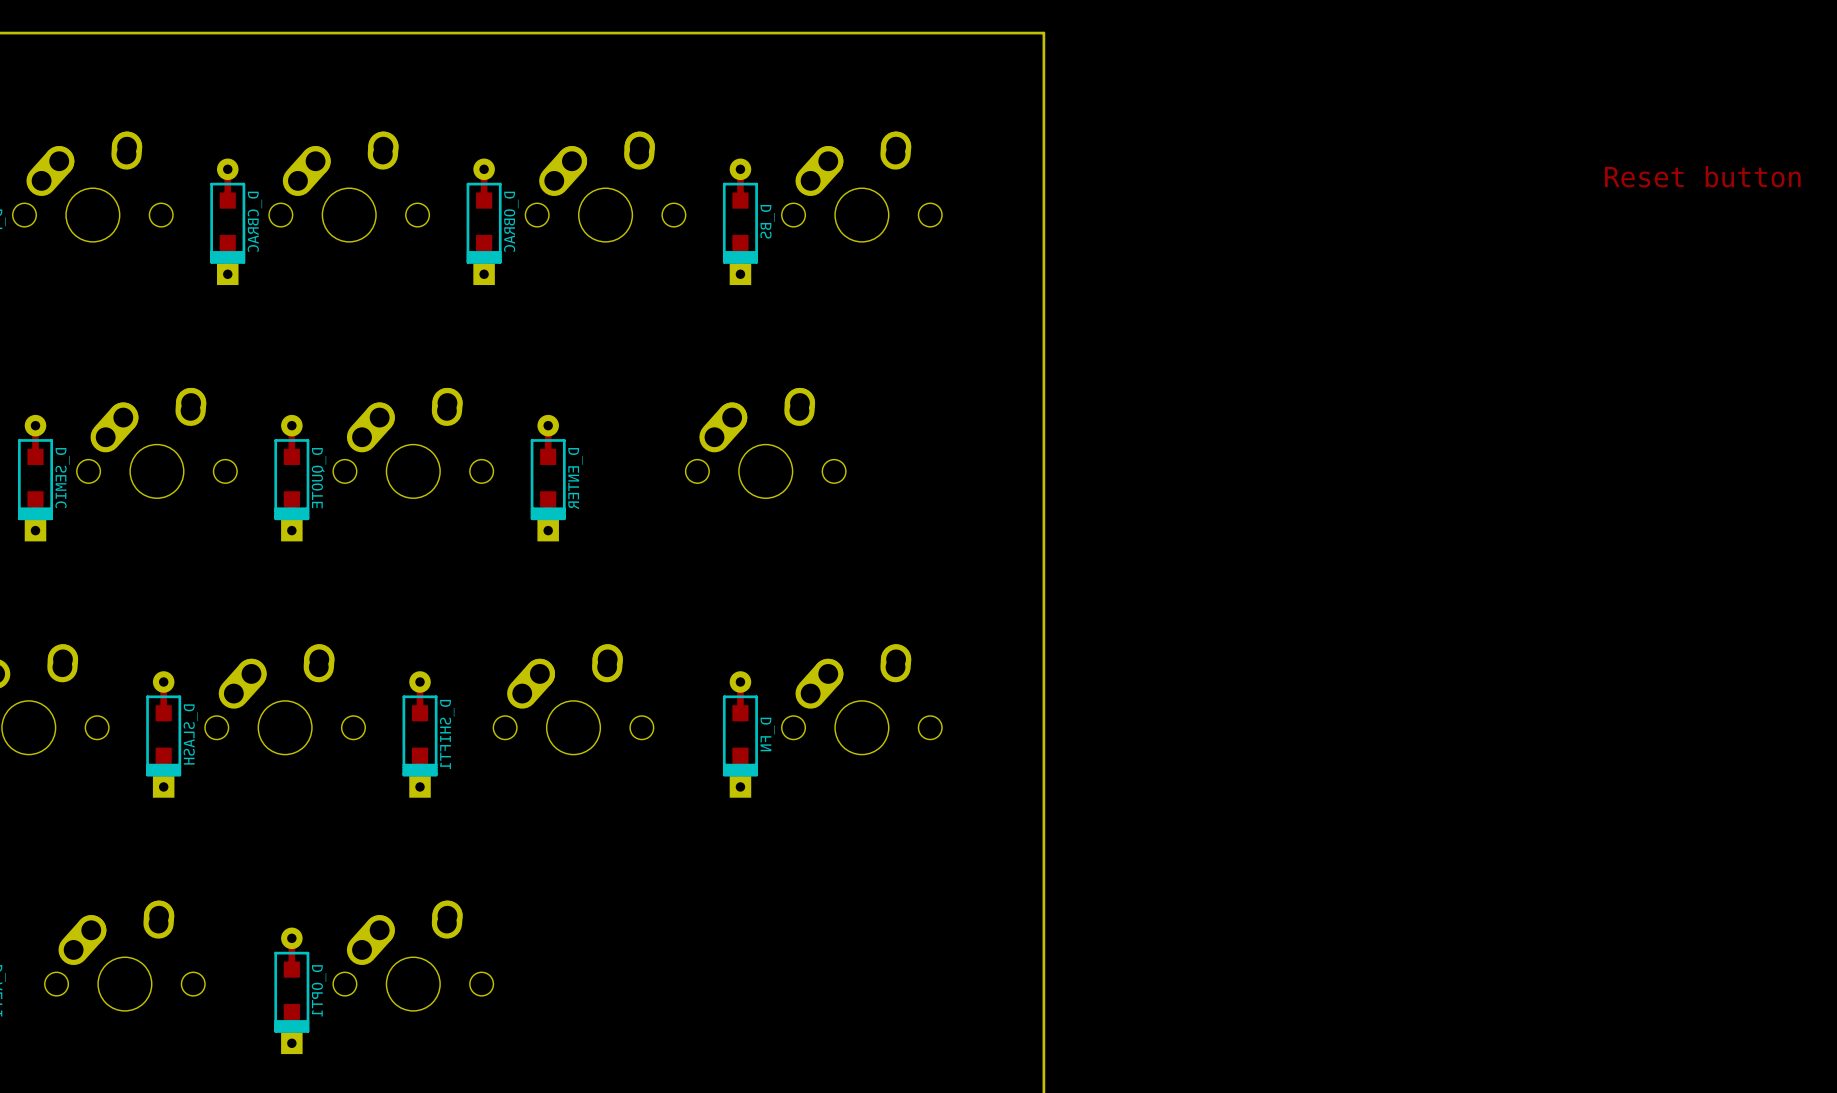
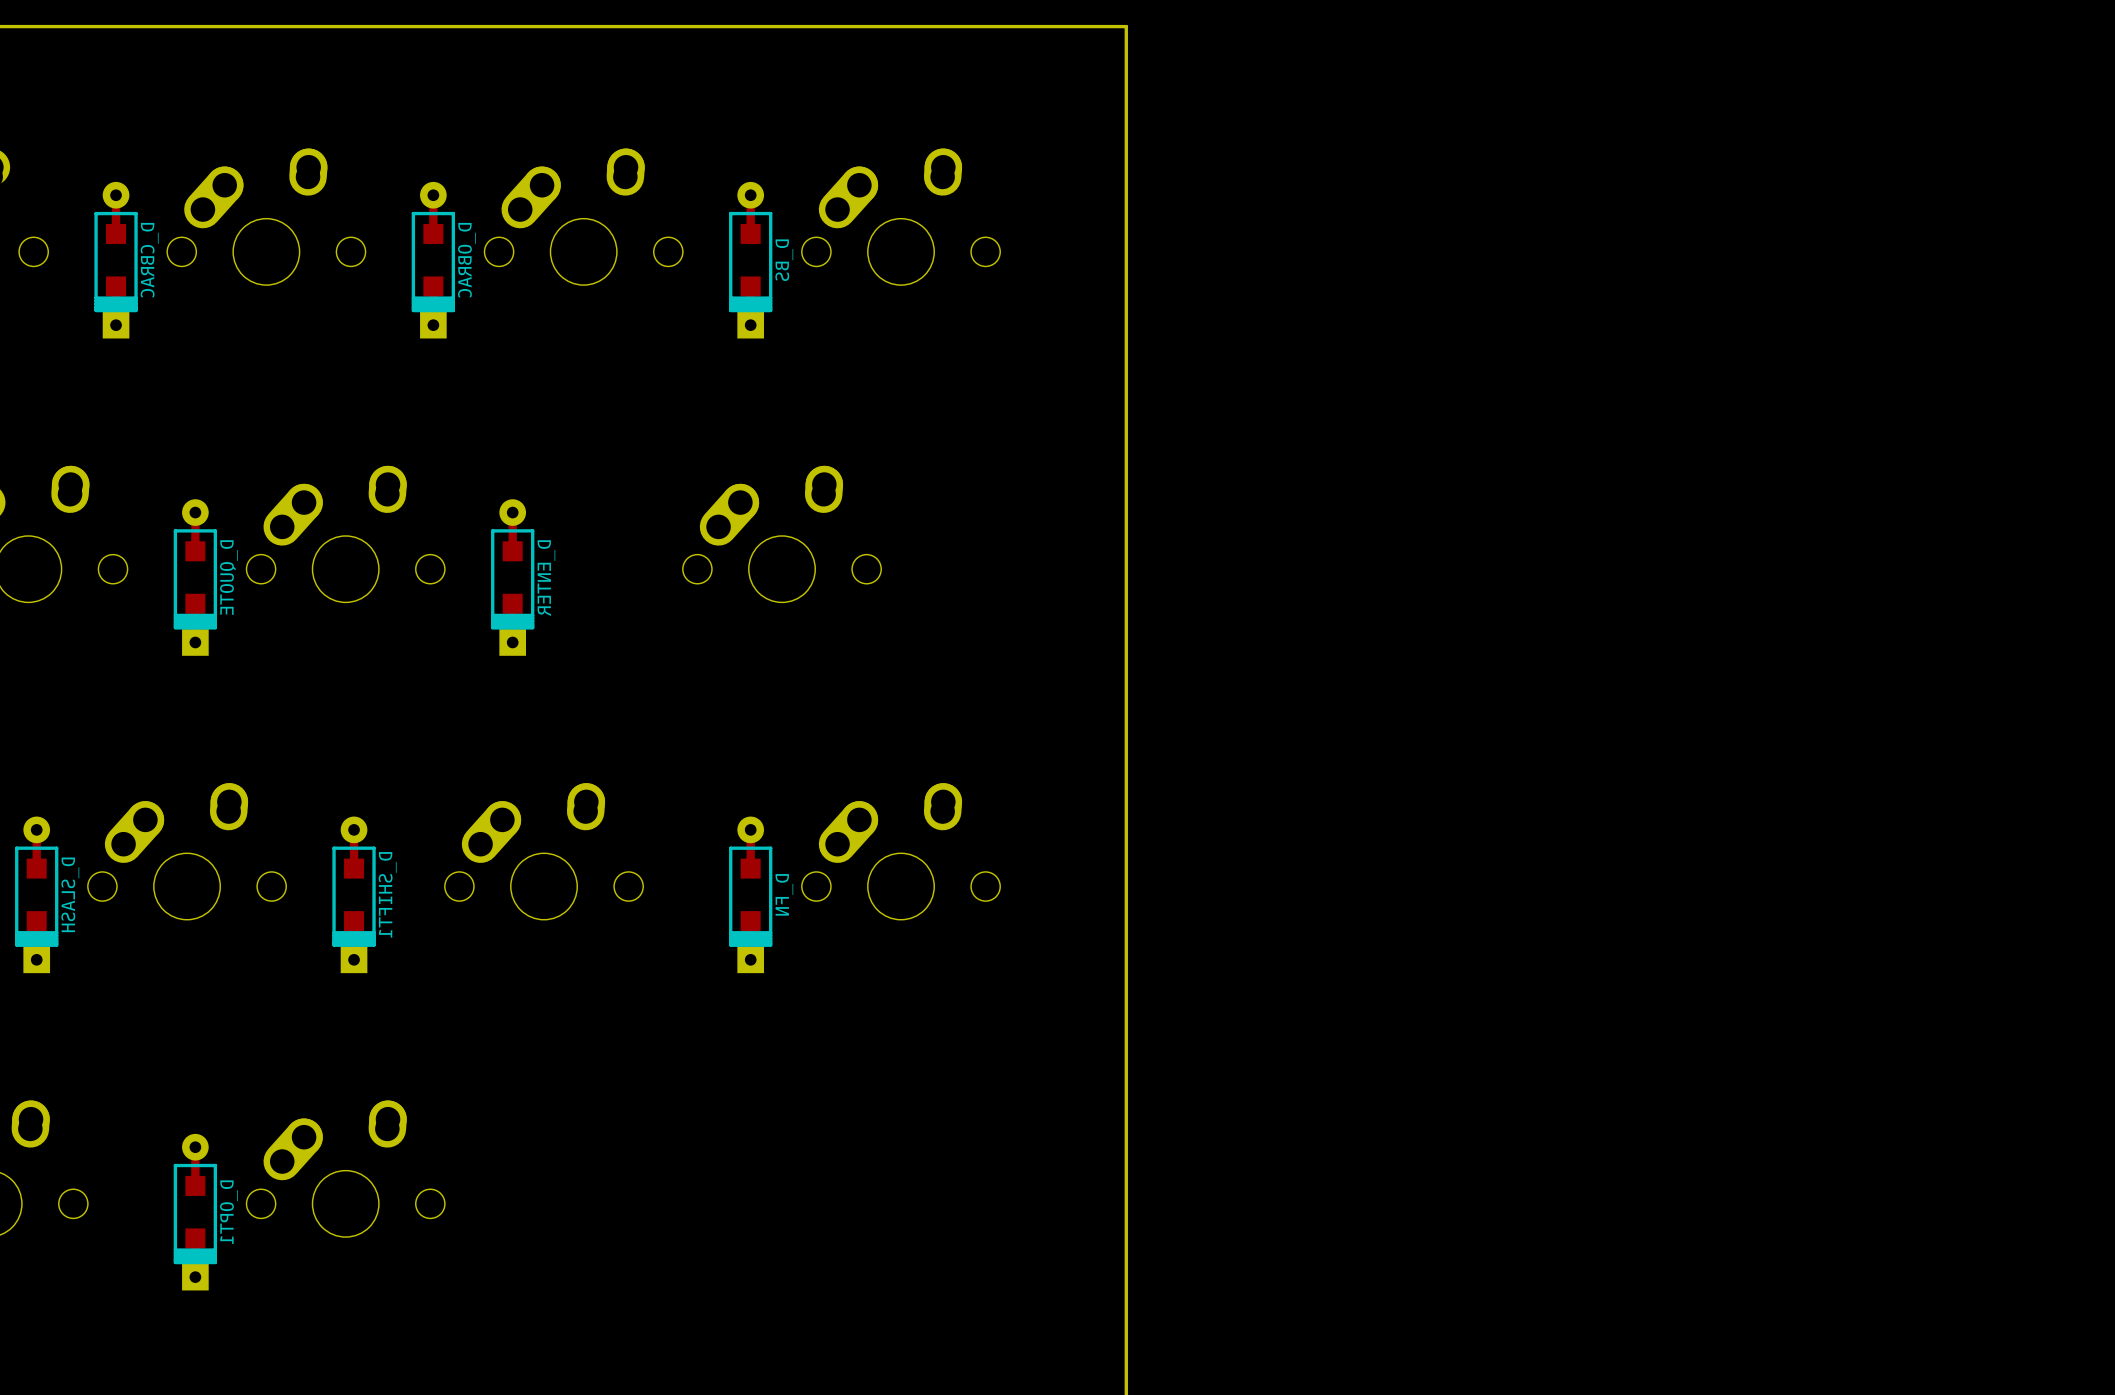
text: Reset button (1702, 176) -> none

